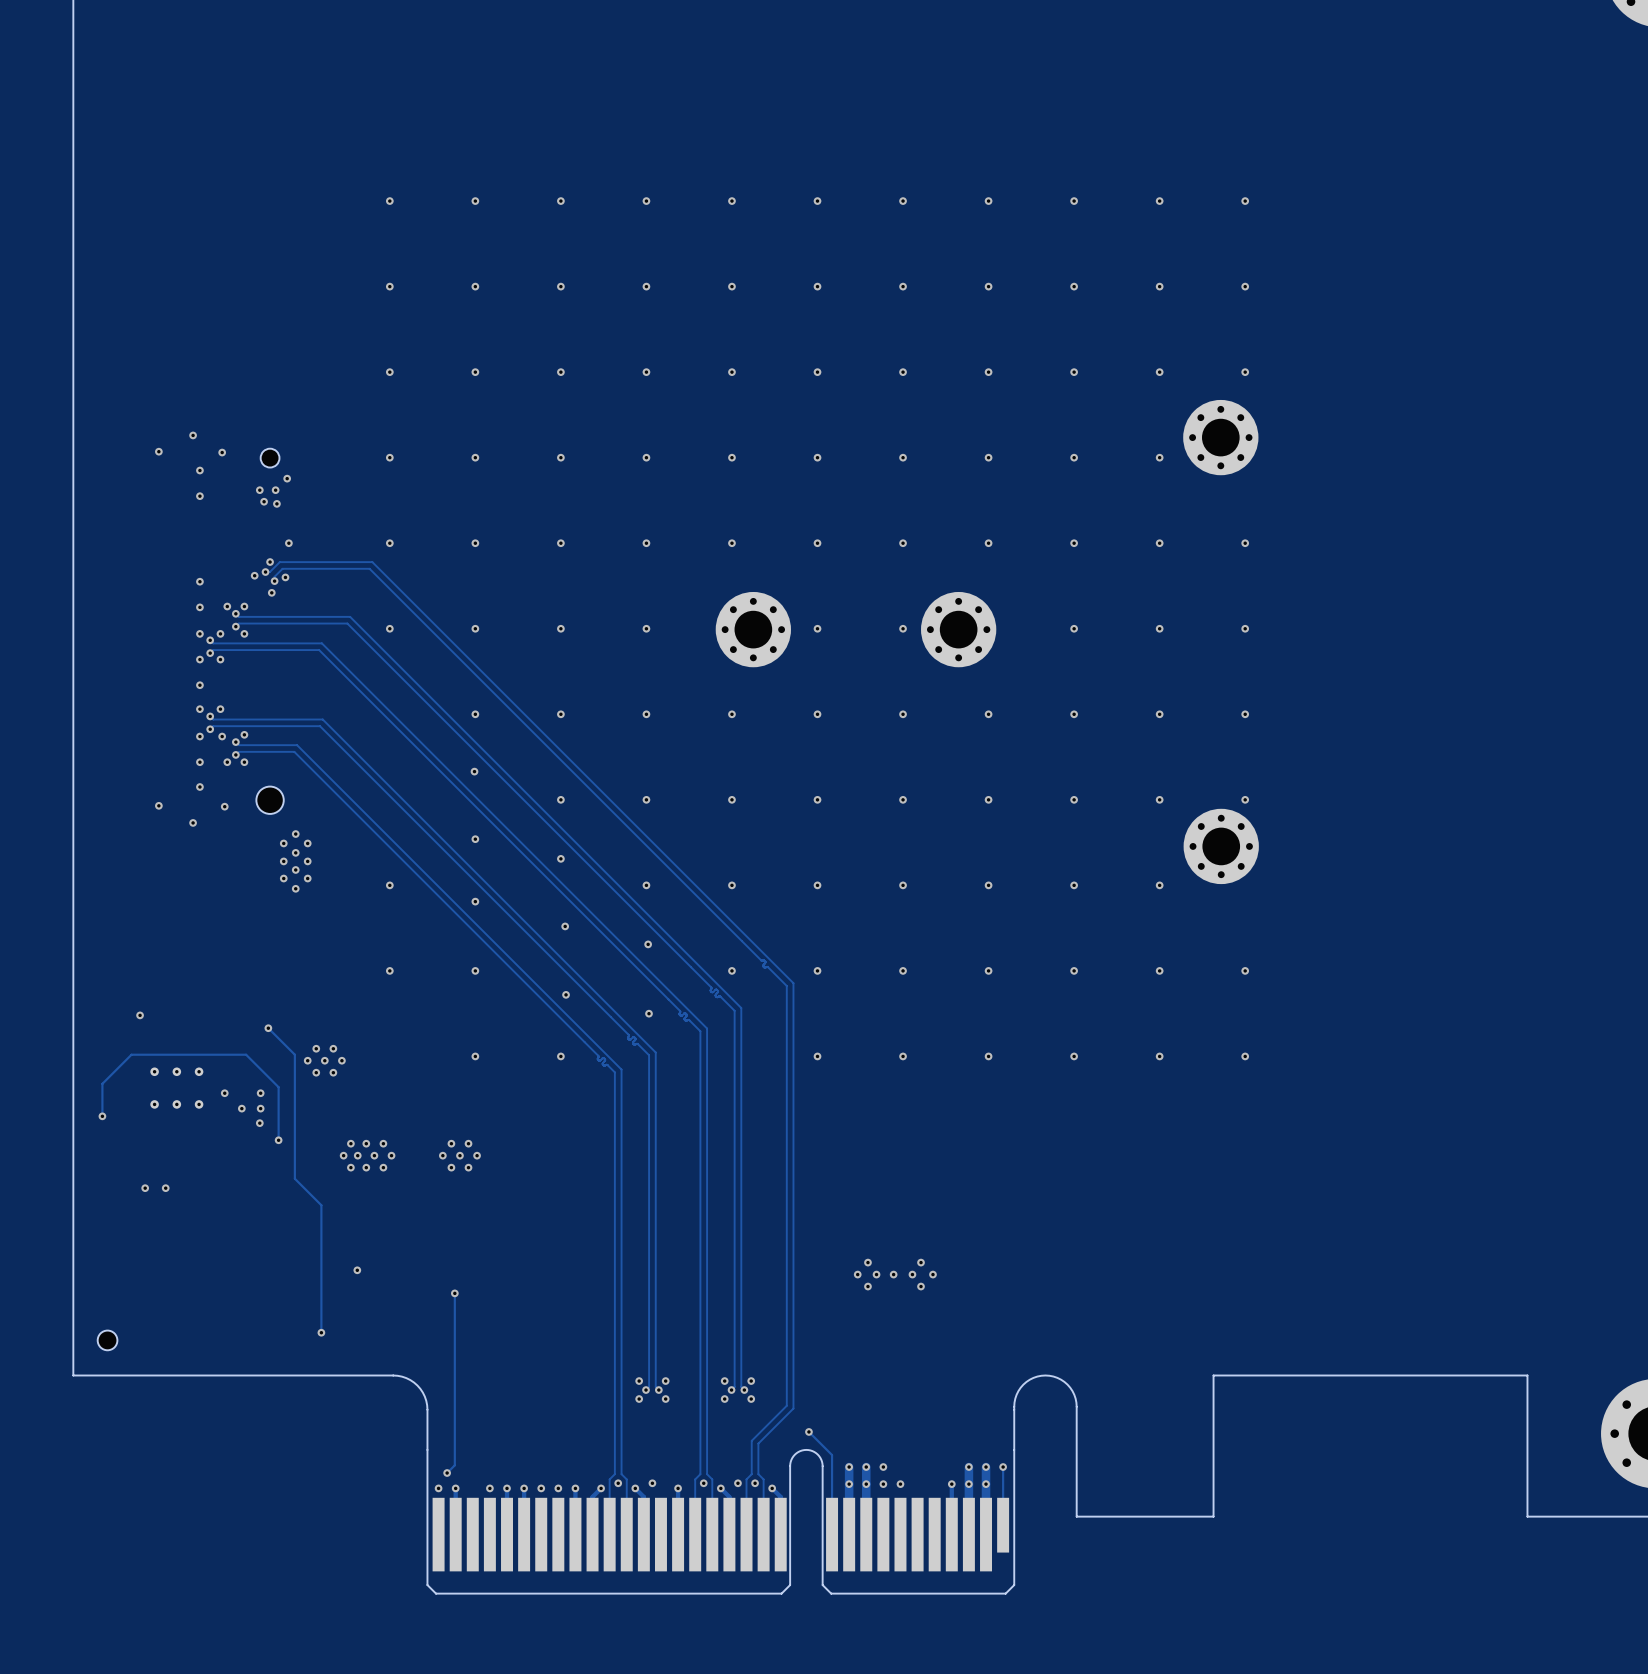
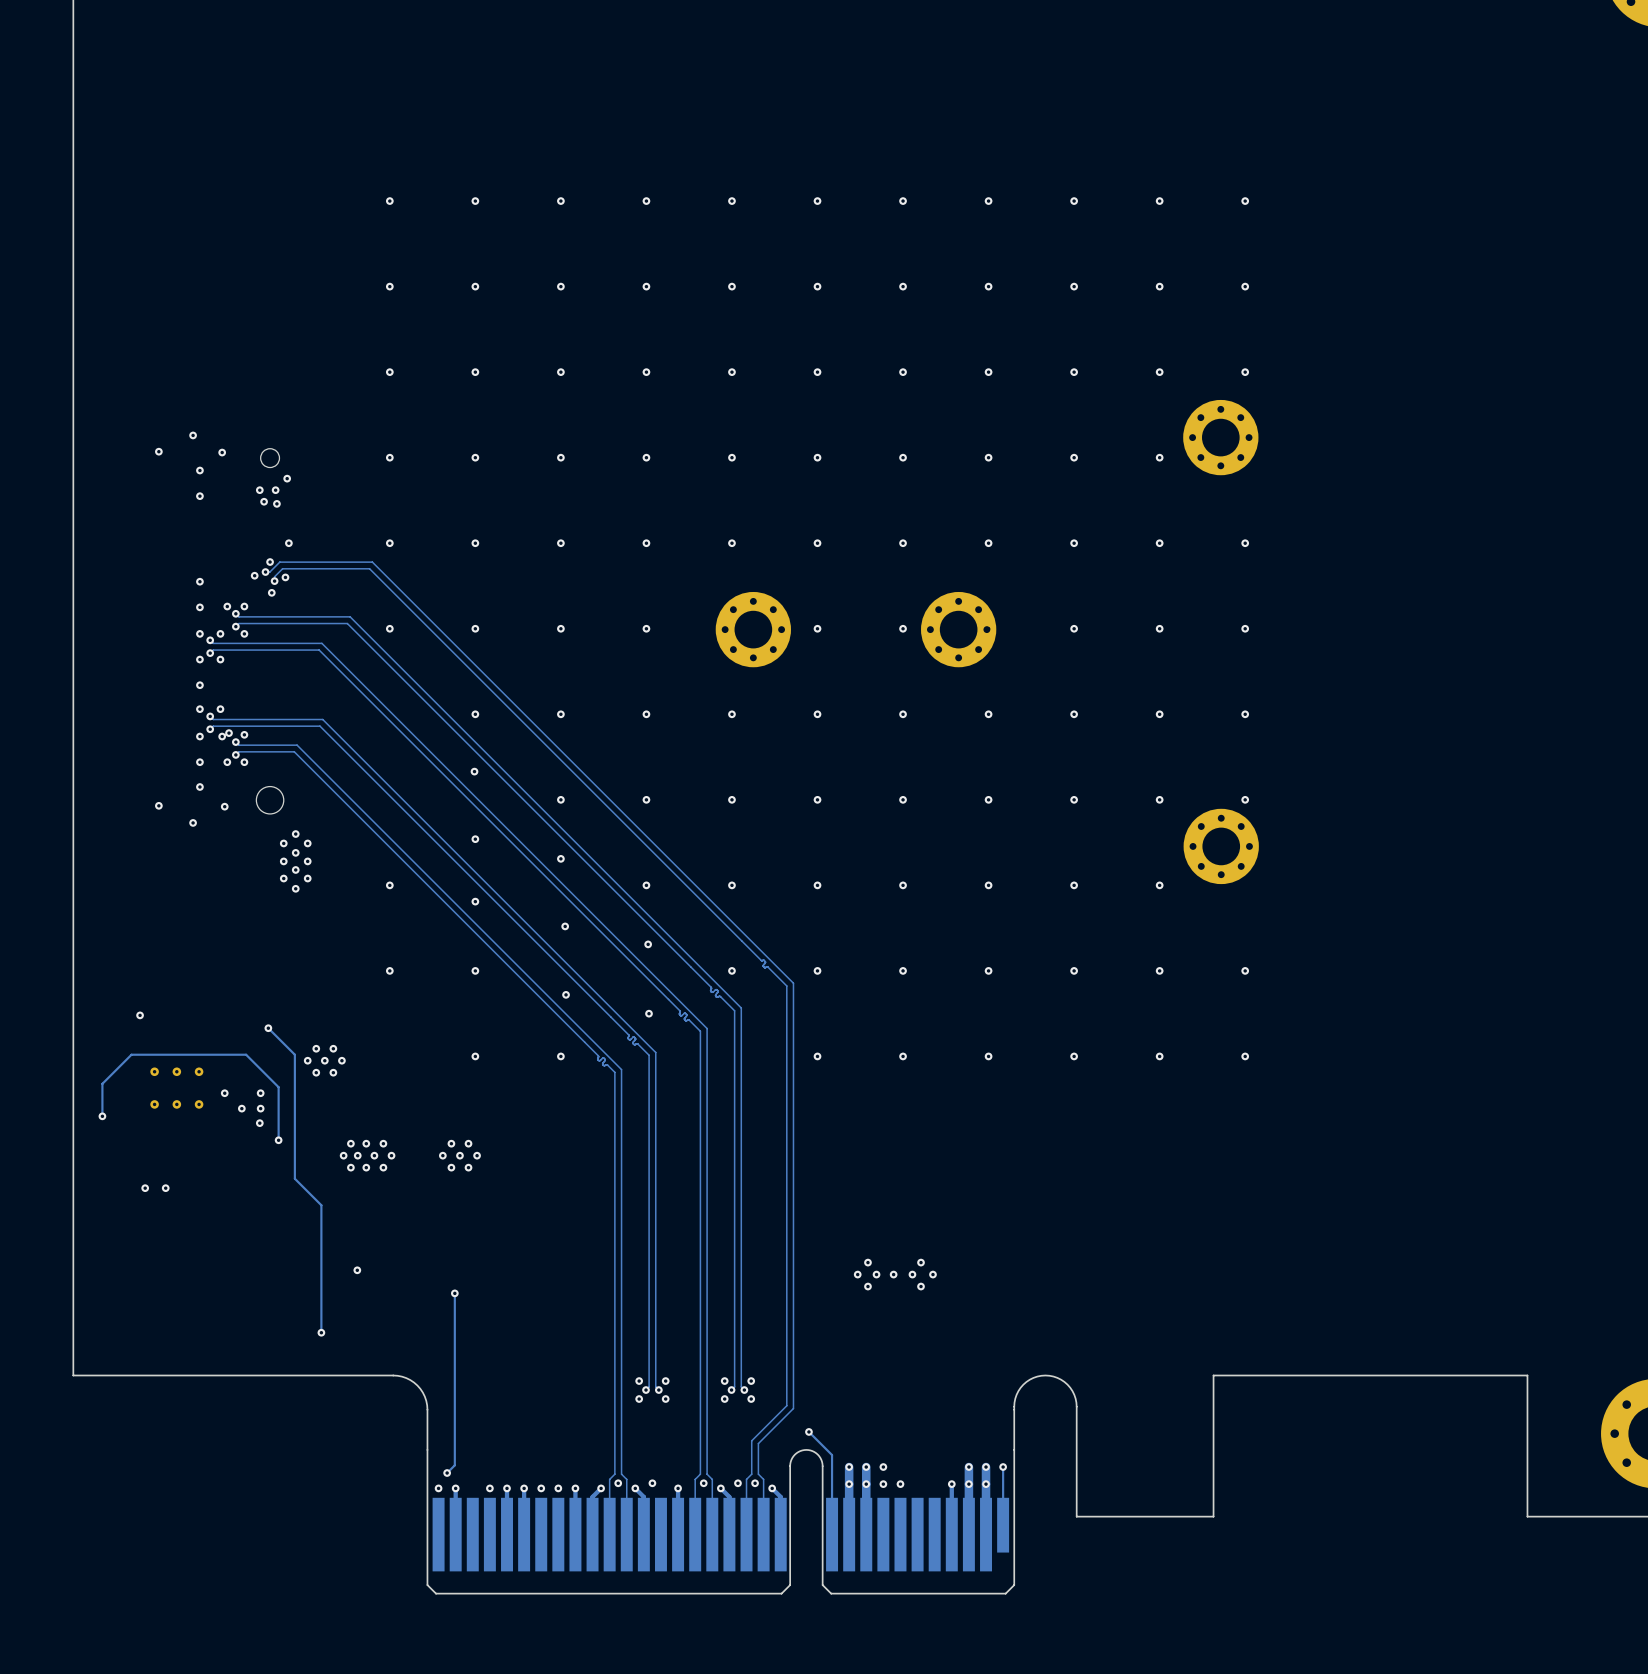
via: none -> (229, 733)
part: (107, 1340) -> none

